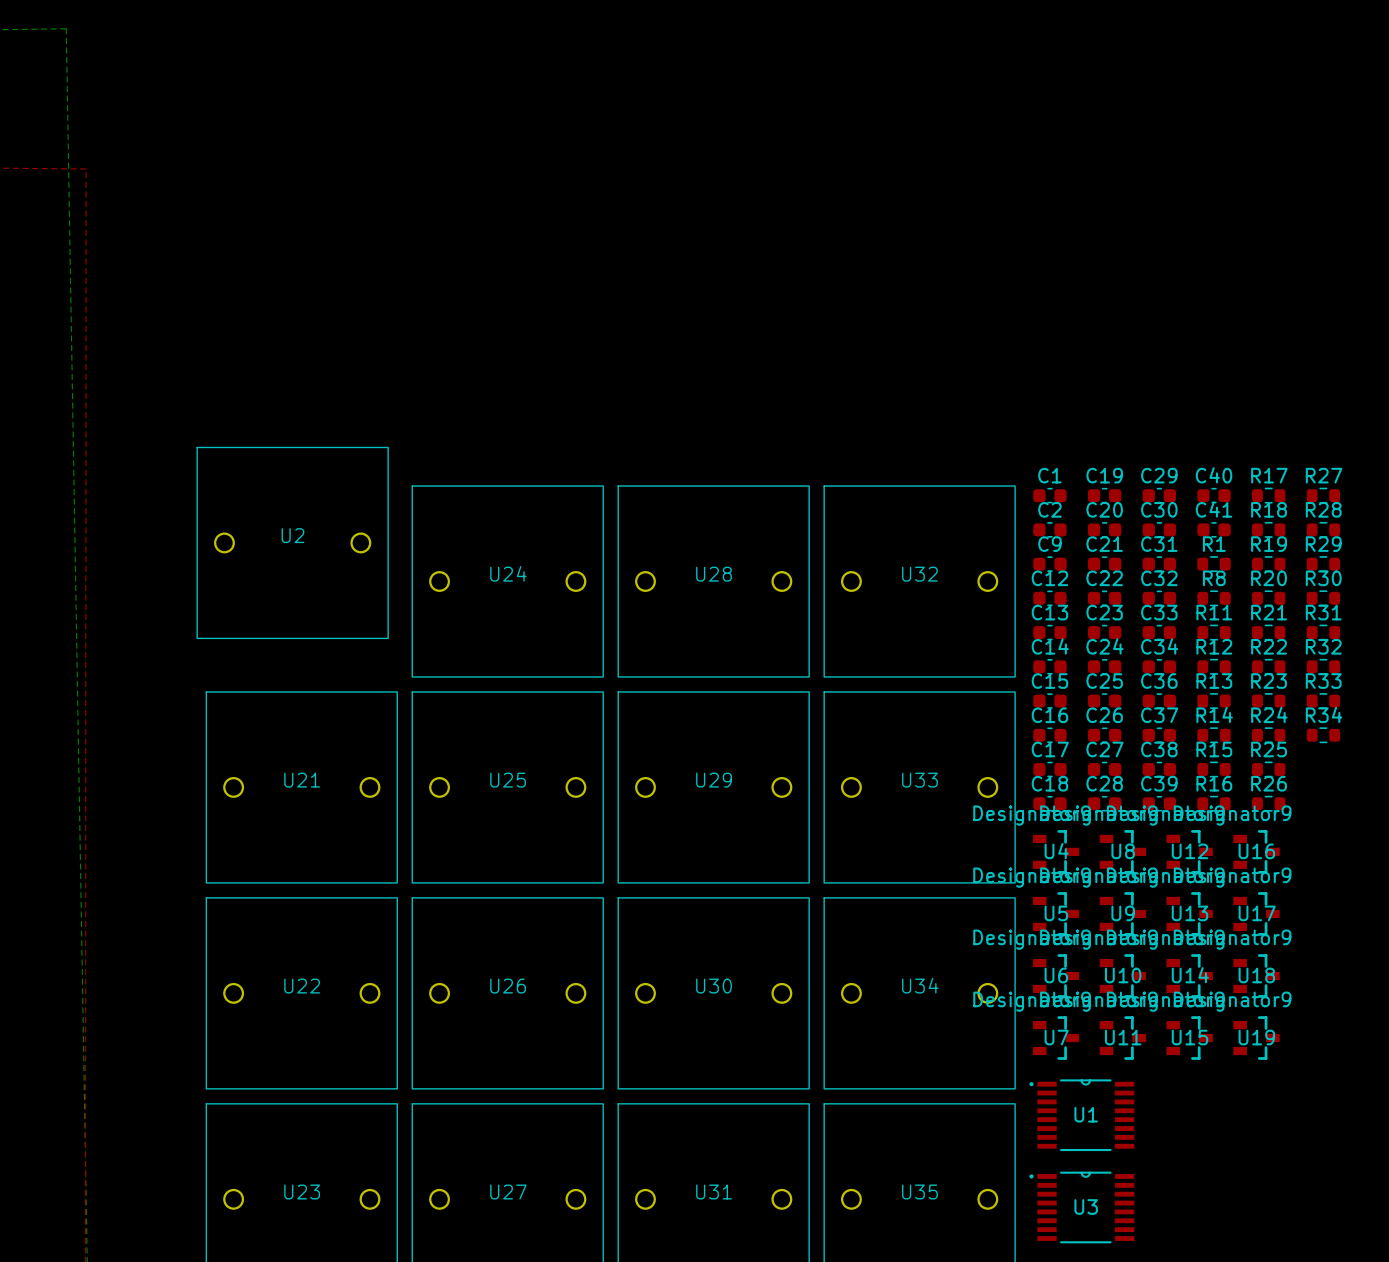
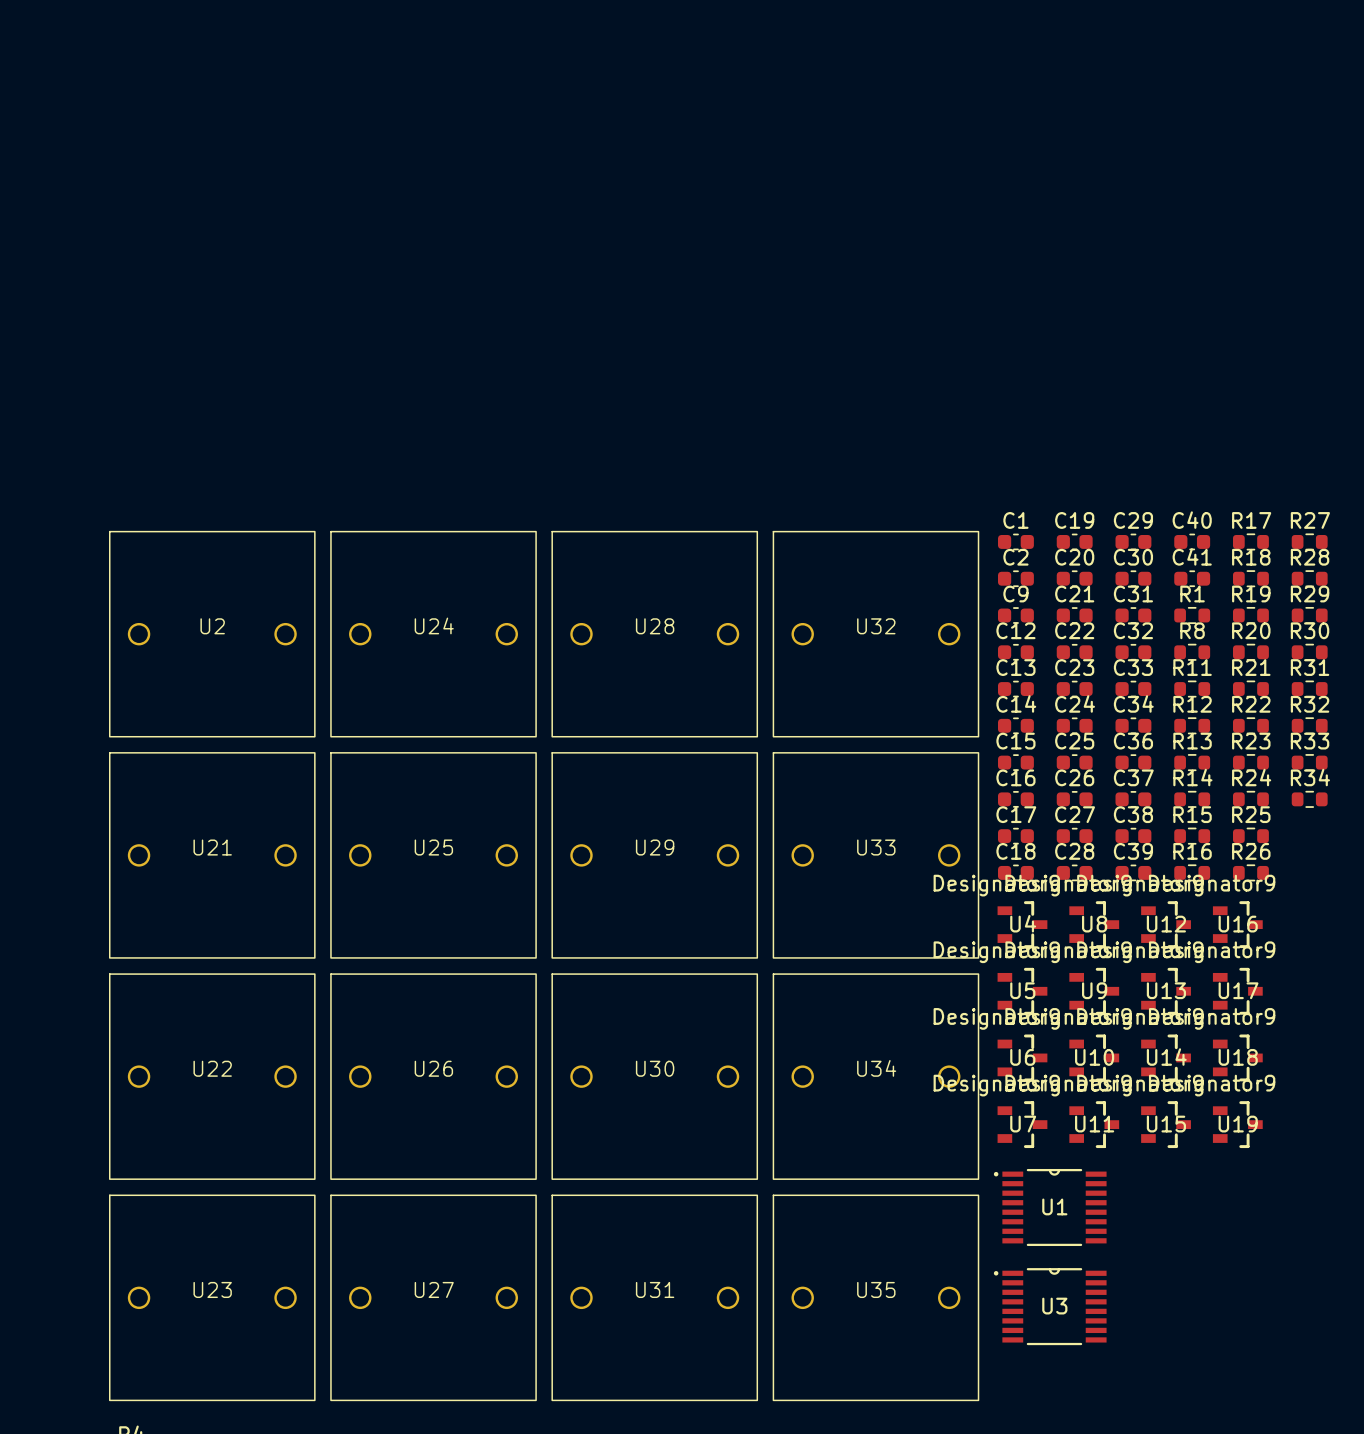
U2 position: (292, 542) -> (212, 634)

